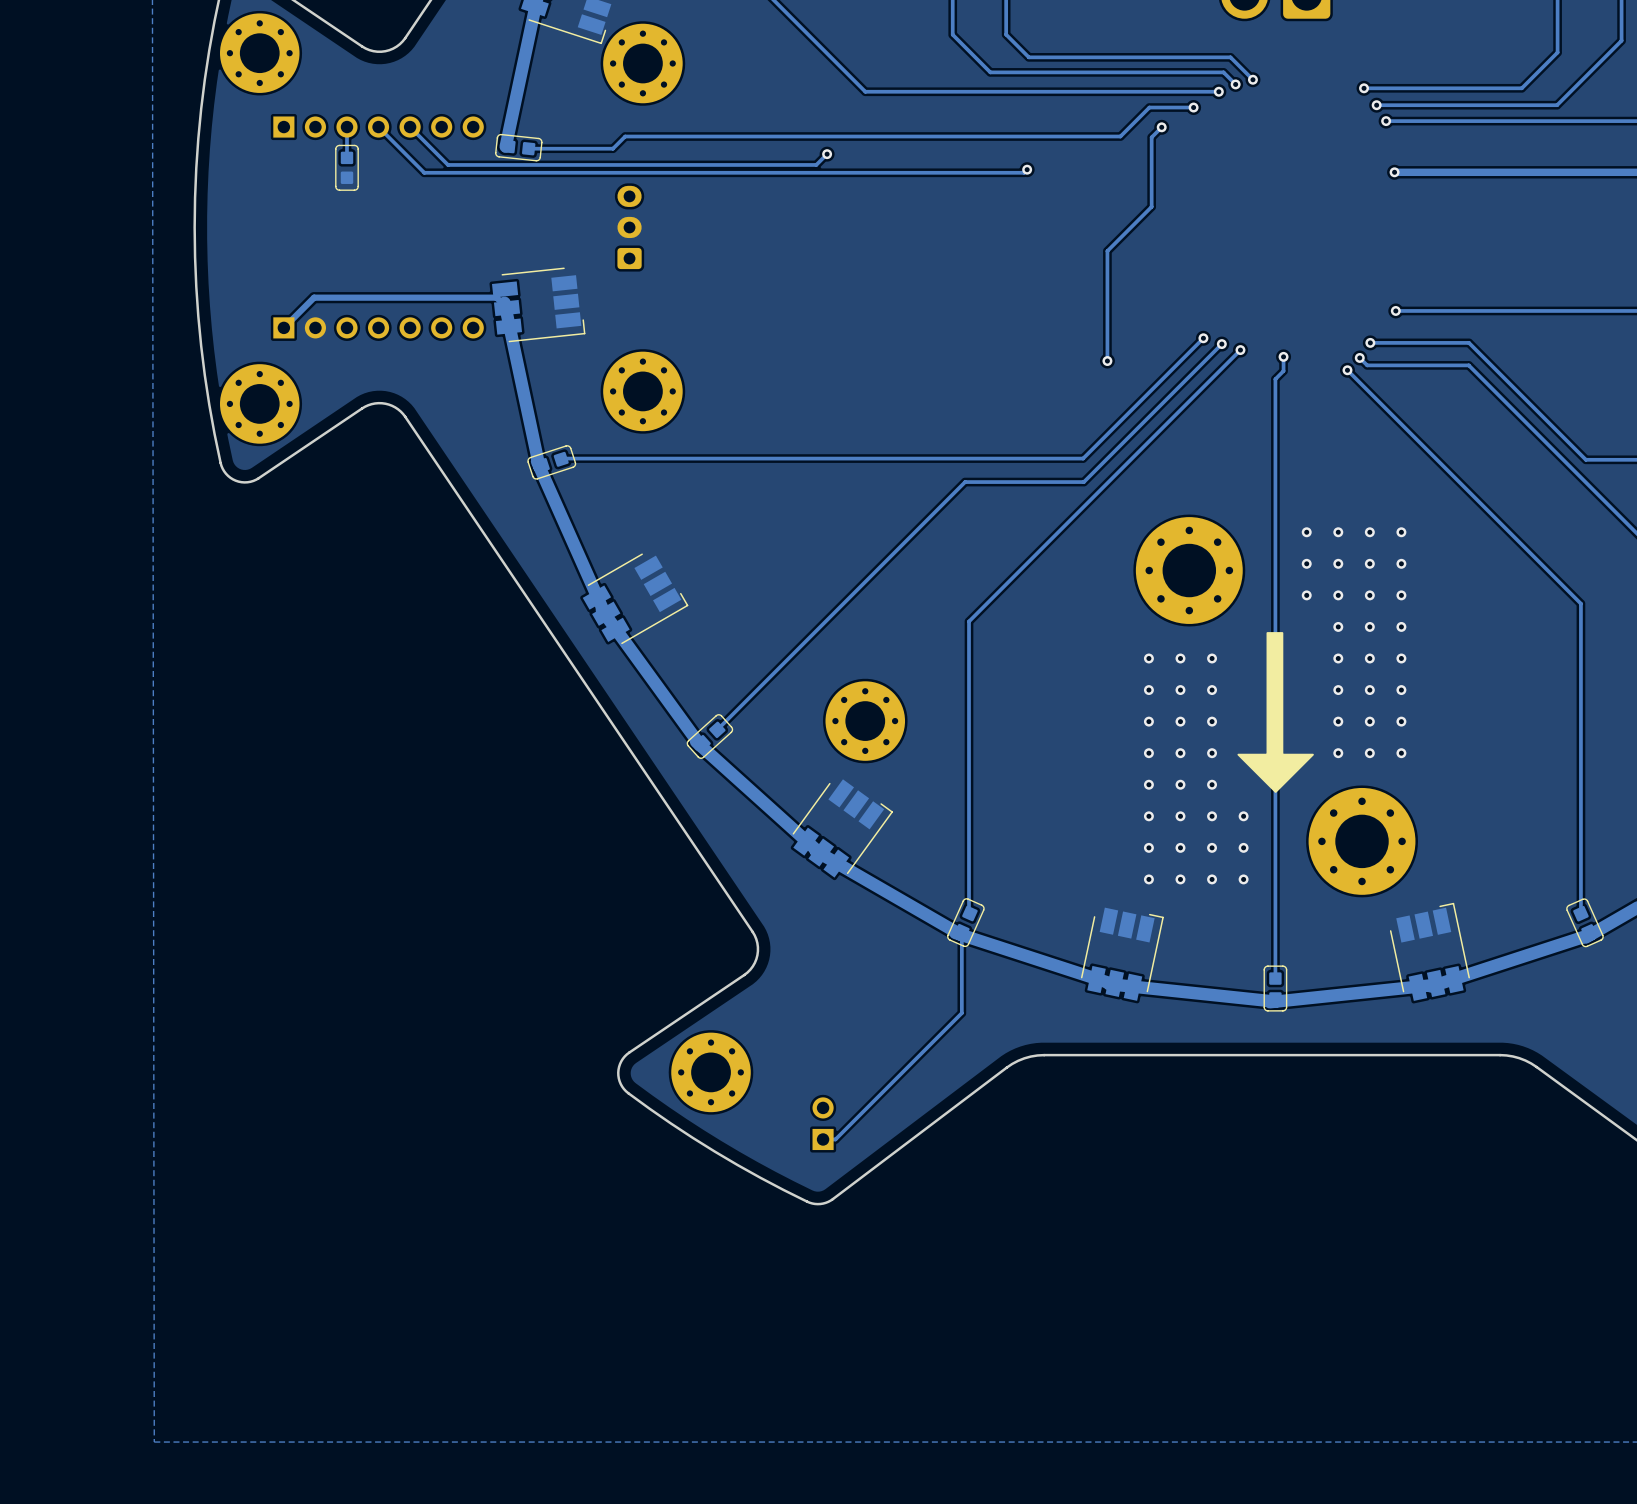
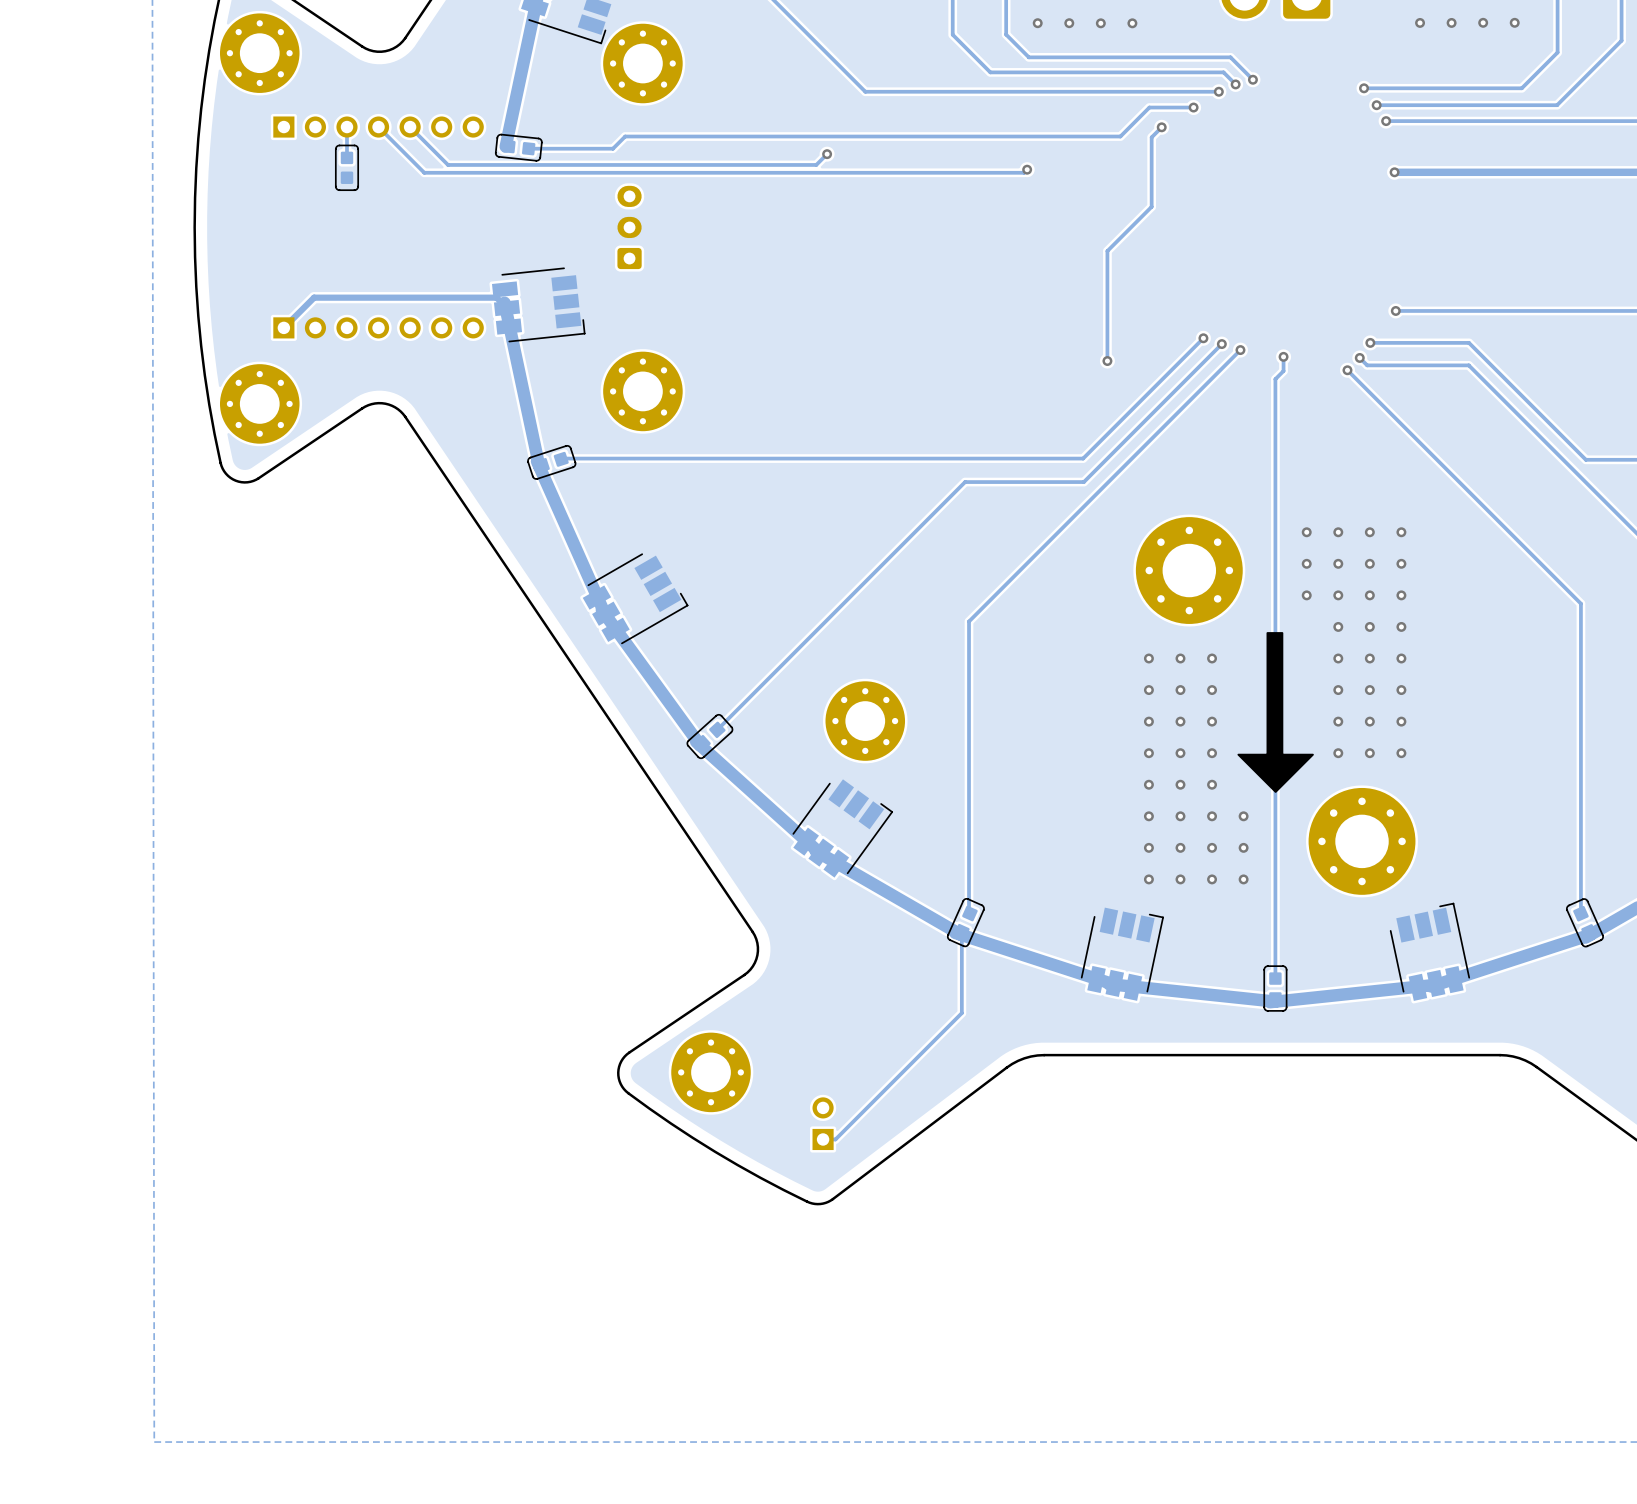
via: none -> (1420, 22)
via: none -> (1451, 22)
via: none -> (1483, 22)
via: none -> (1514, 22)
via: none -> (1037, 23)
via: none -> (1069, 23)
via: none -> (1100, 23)
via: none -> (1132, 23)

